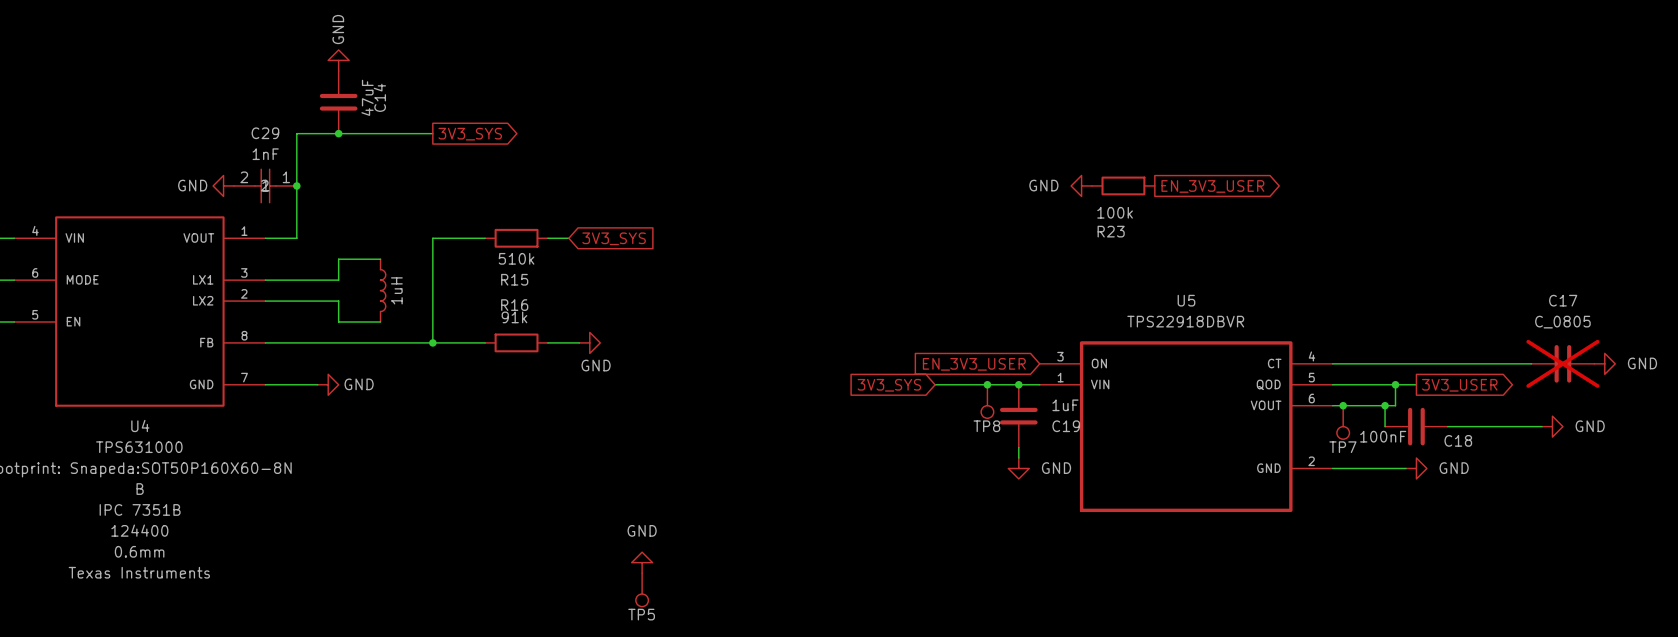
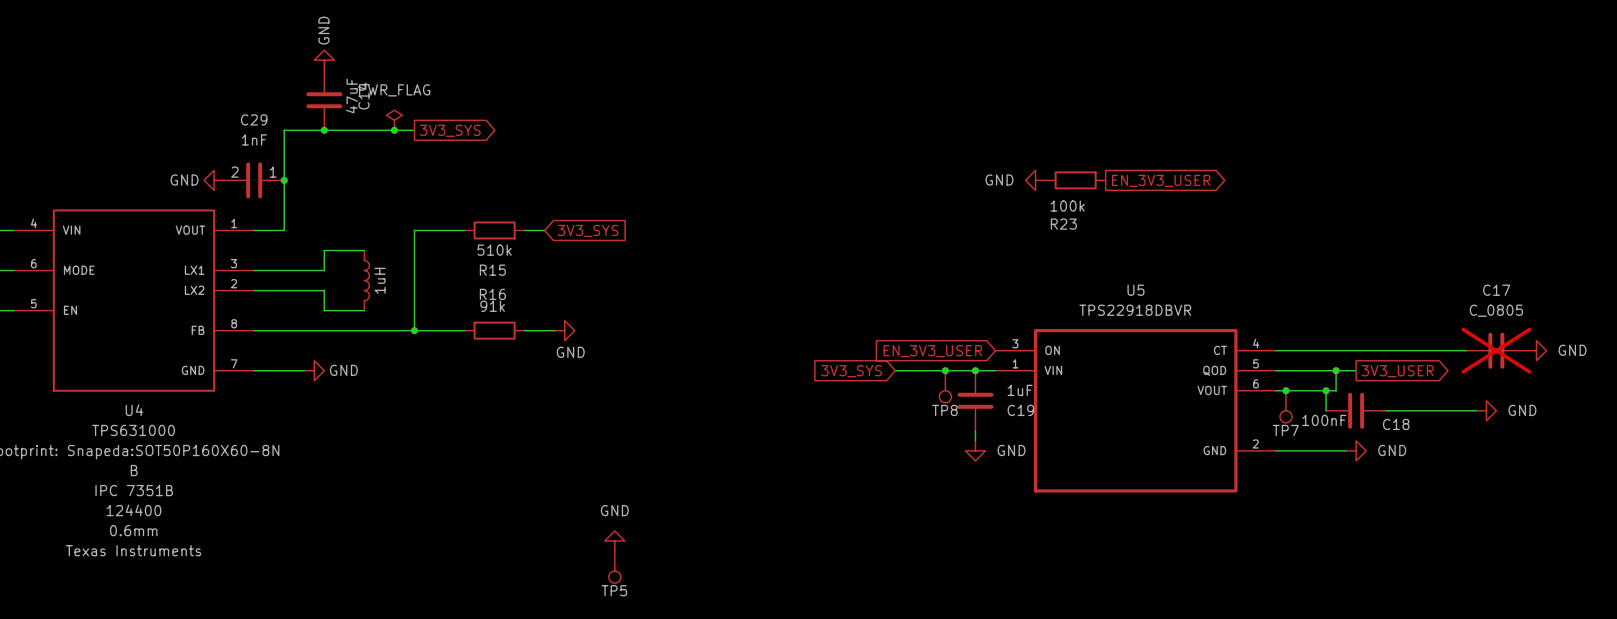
power symbol: none -> PWR_FLAG (394, 120)
junction: none -> (394, 130)
C29 symbol: [234, 169, 297, 203] -> [224, 162, 285, 199]

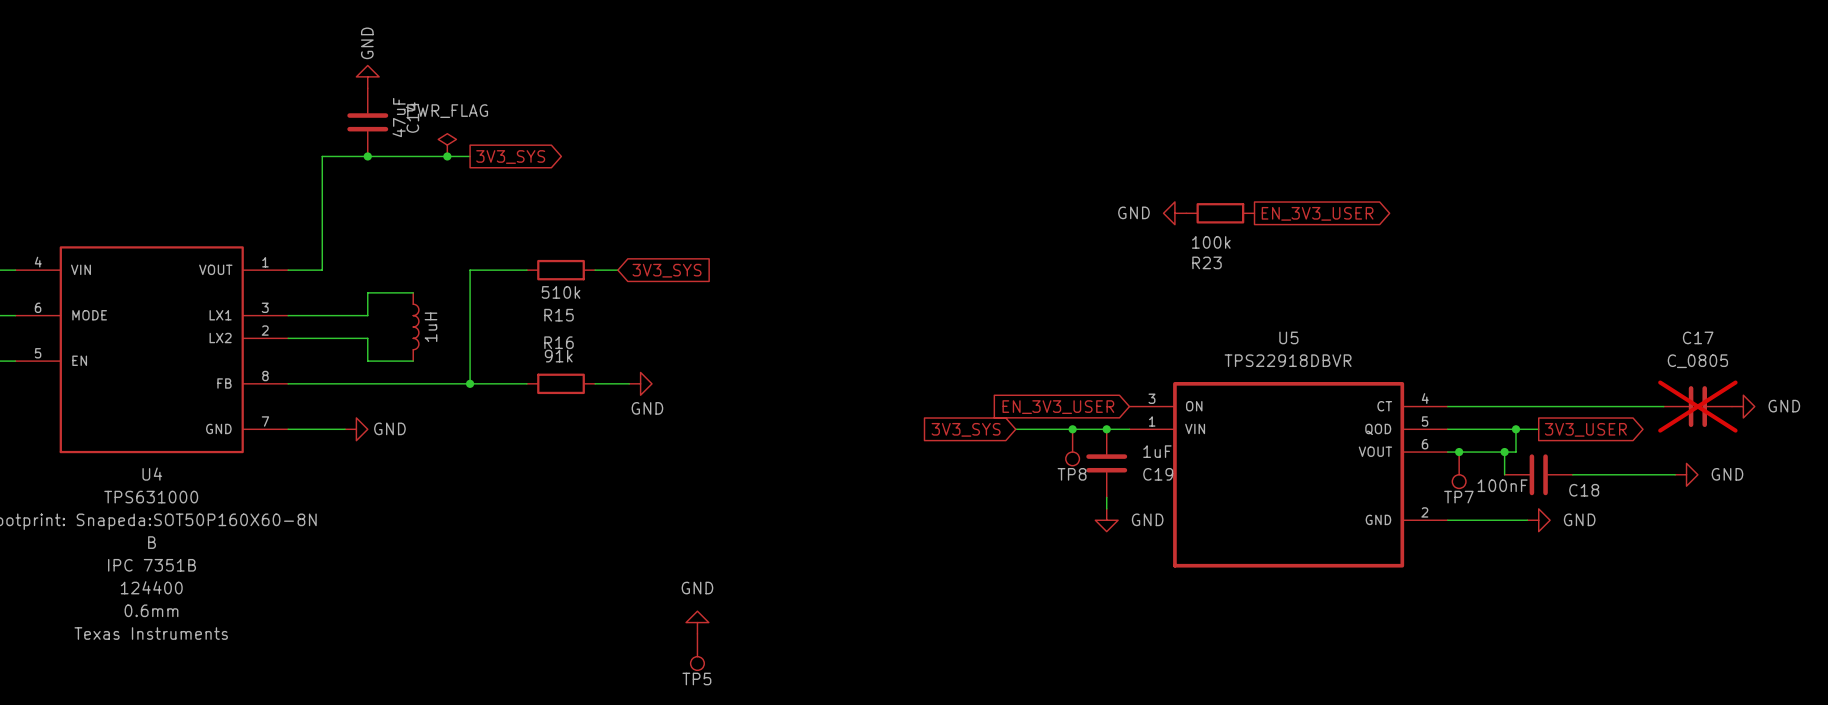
power symbol: GND (214, 180) -> none
C29: 1nF (254, 180) -> none
junction: (284, 180) -> none

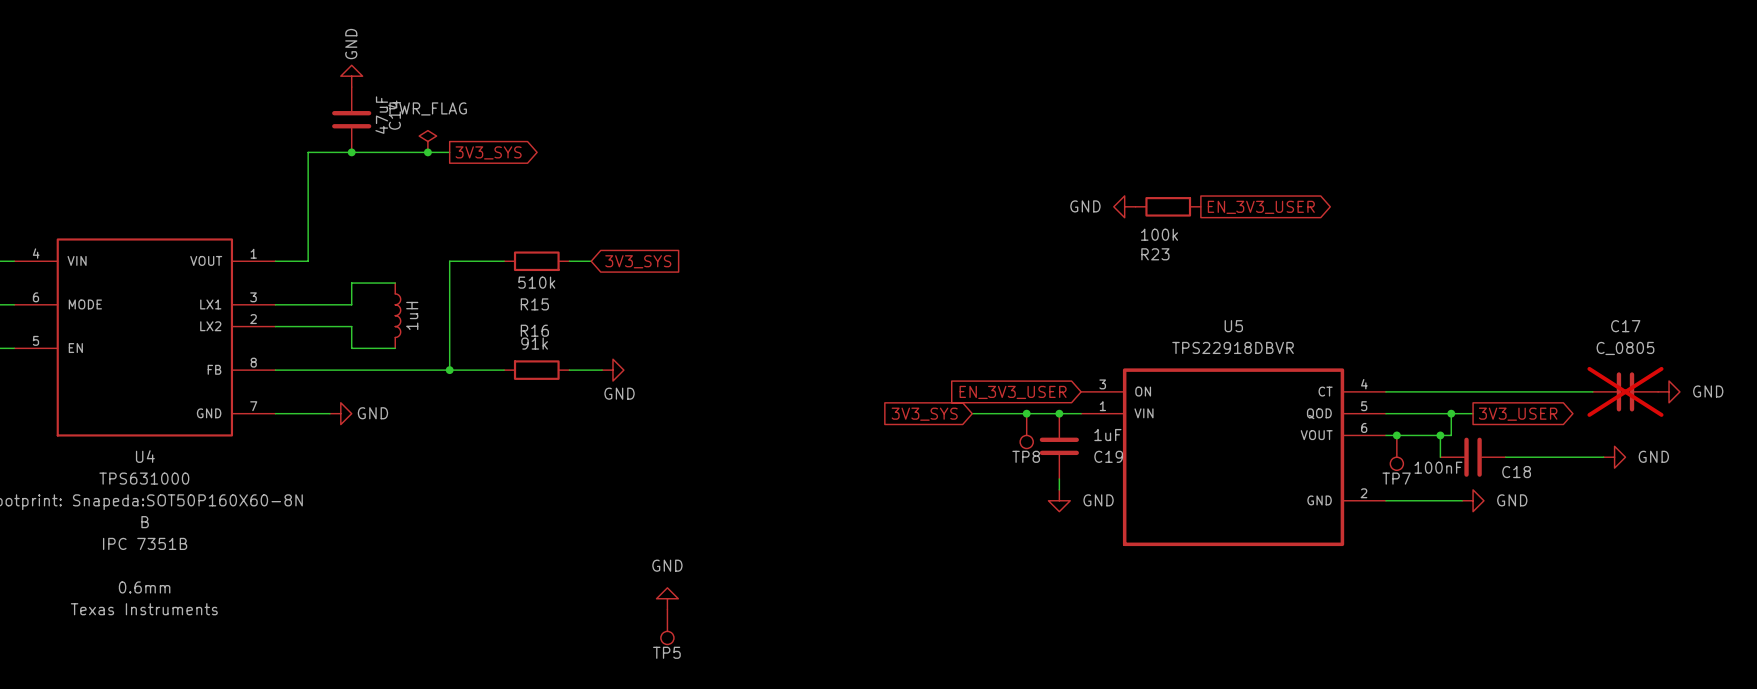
U4 text: 124400 (151, 587) -> none

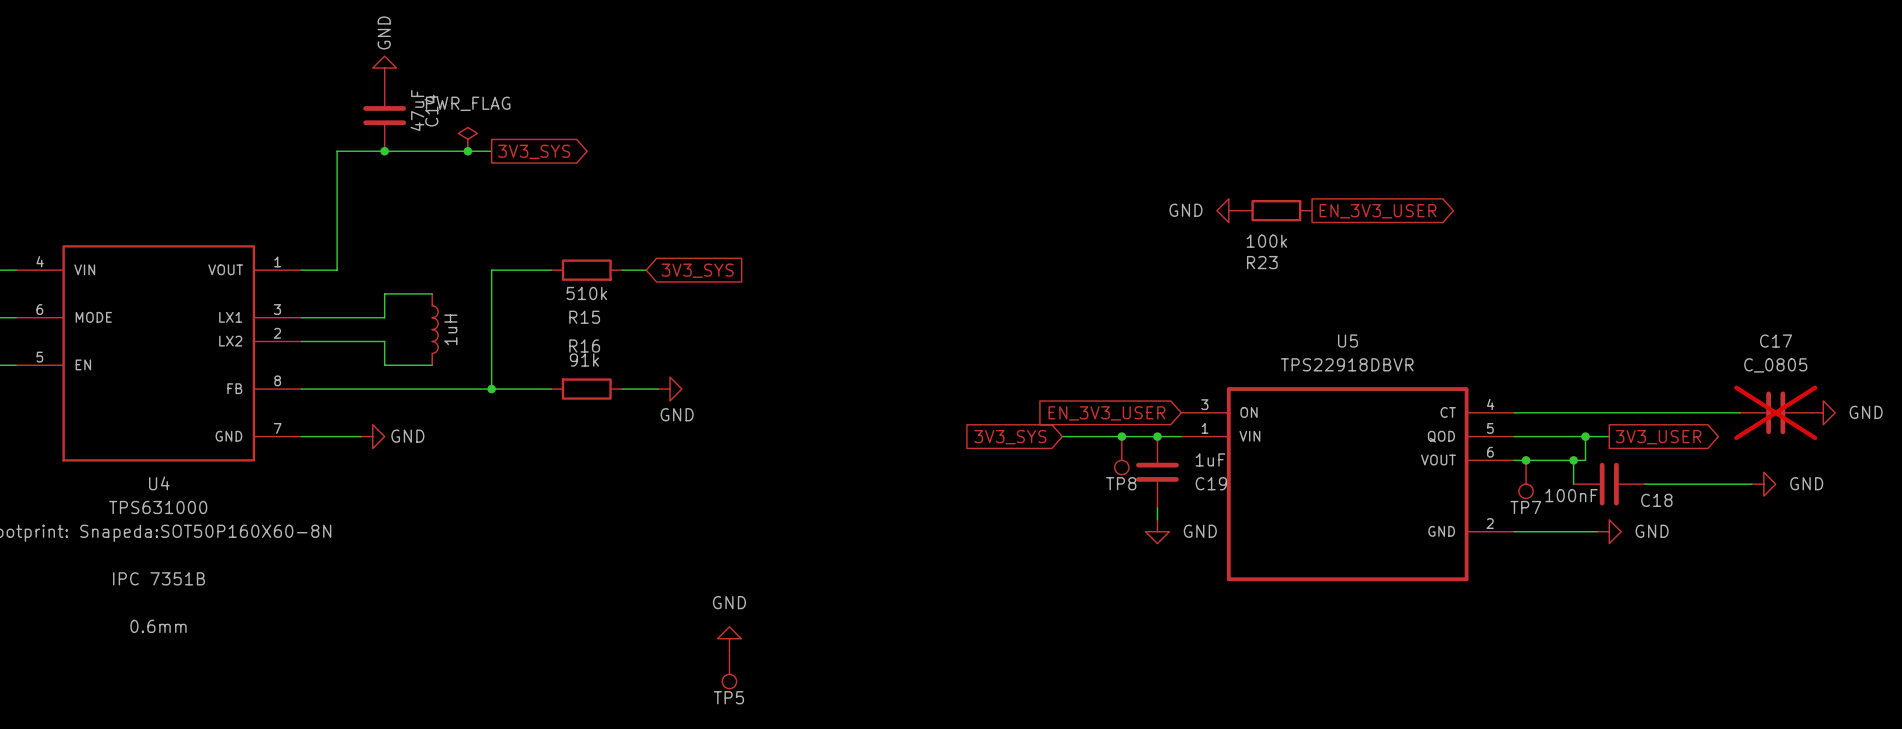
U4 text: B (145, 522) -> none
U4 text: Texas Instruments (144, 609) -> none

